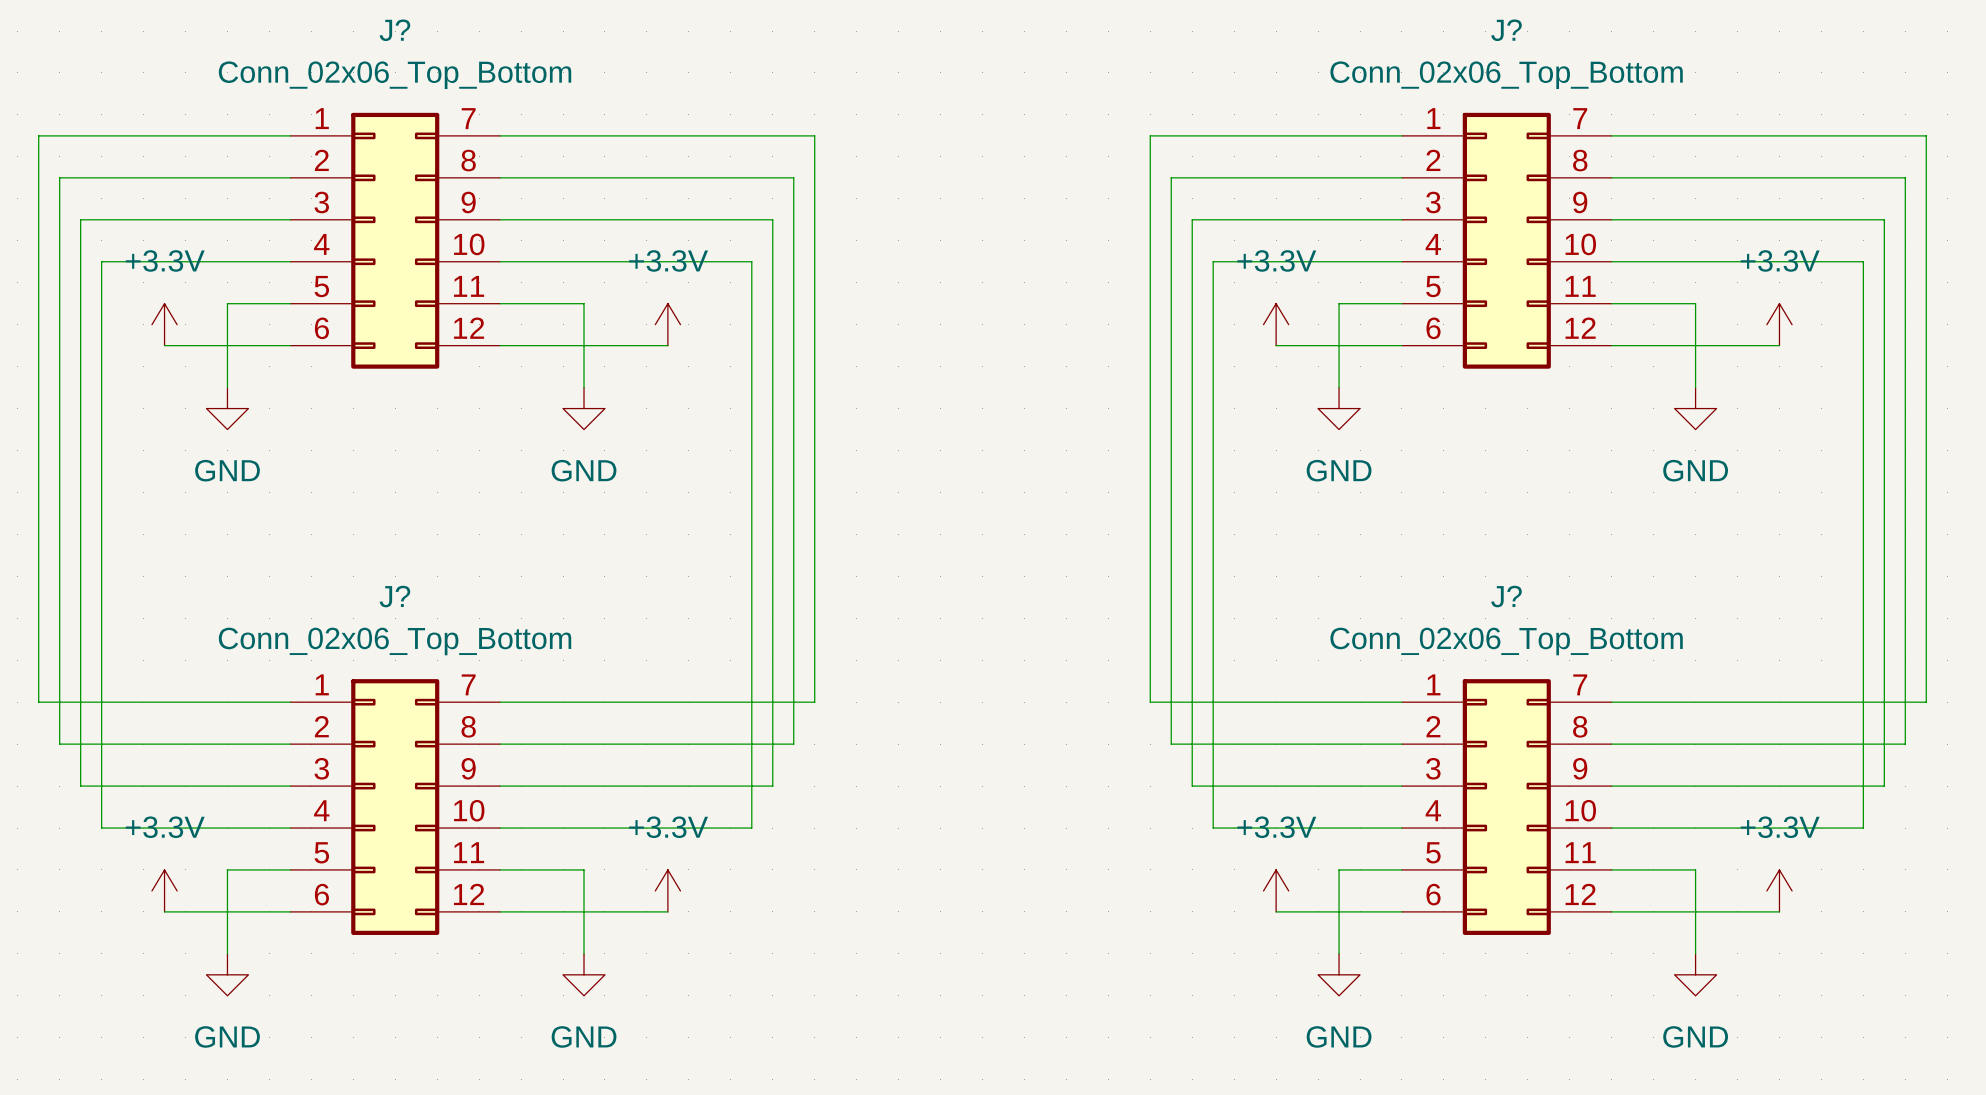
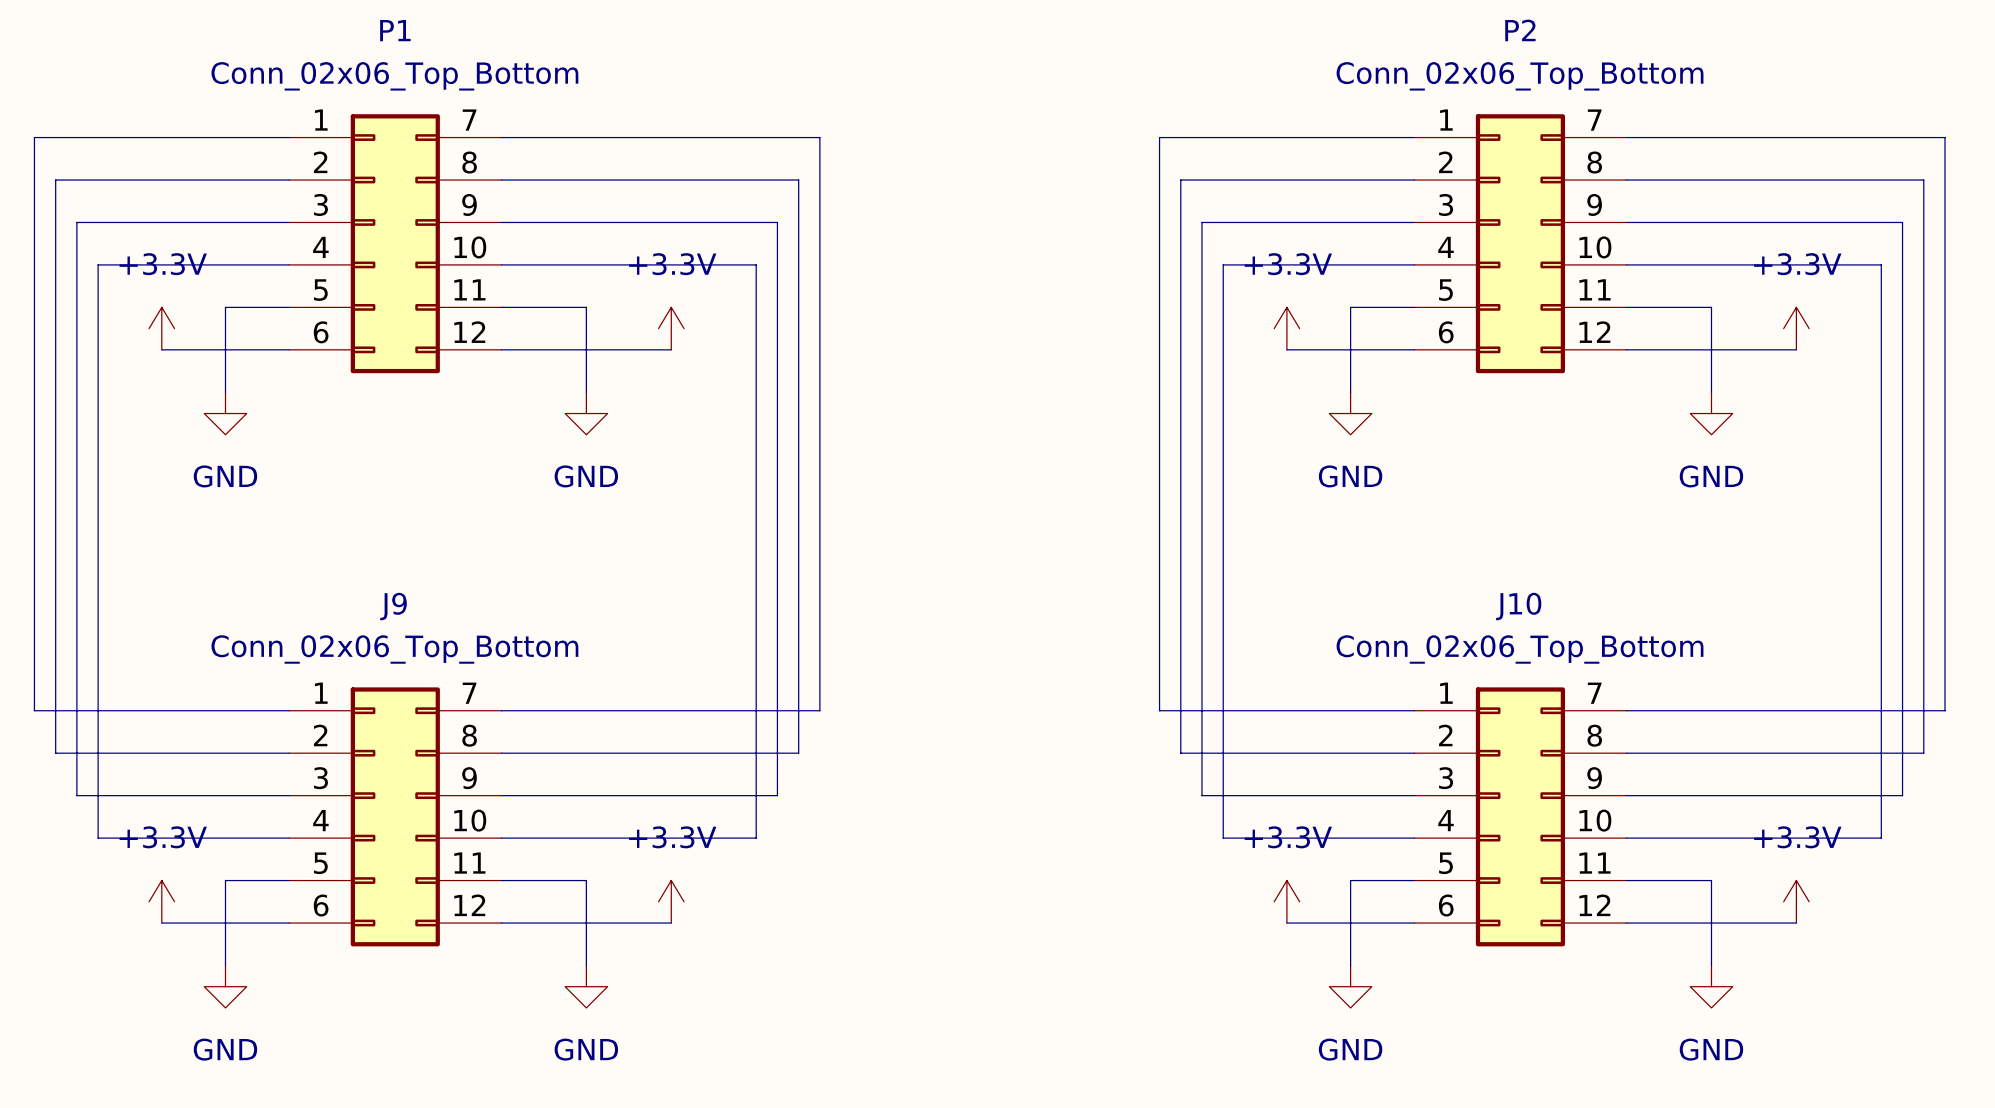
J? name: J? (394, 30) -> P1 (395, 30)
J? name: J? (1506, 30) -> P2 (1520, 30)
J? name: J? (394, 596) -> J9 (393, 606)
J? name: J? (1506, 596) -> J10 (1518, 606)

